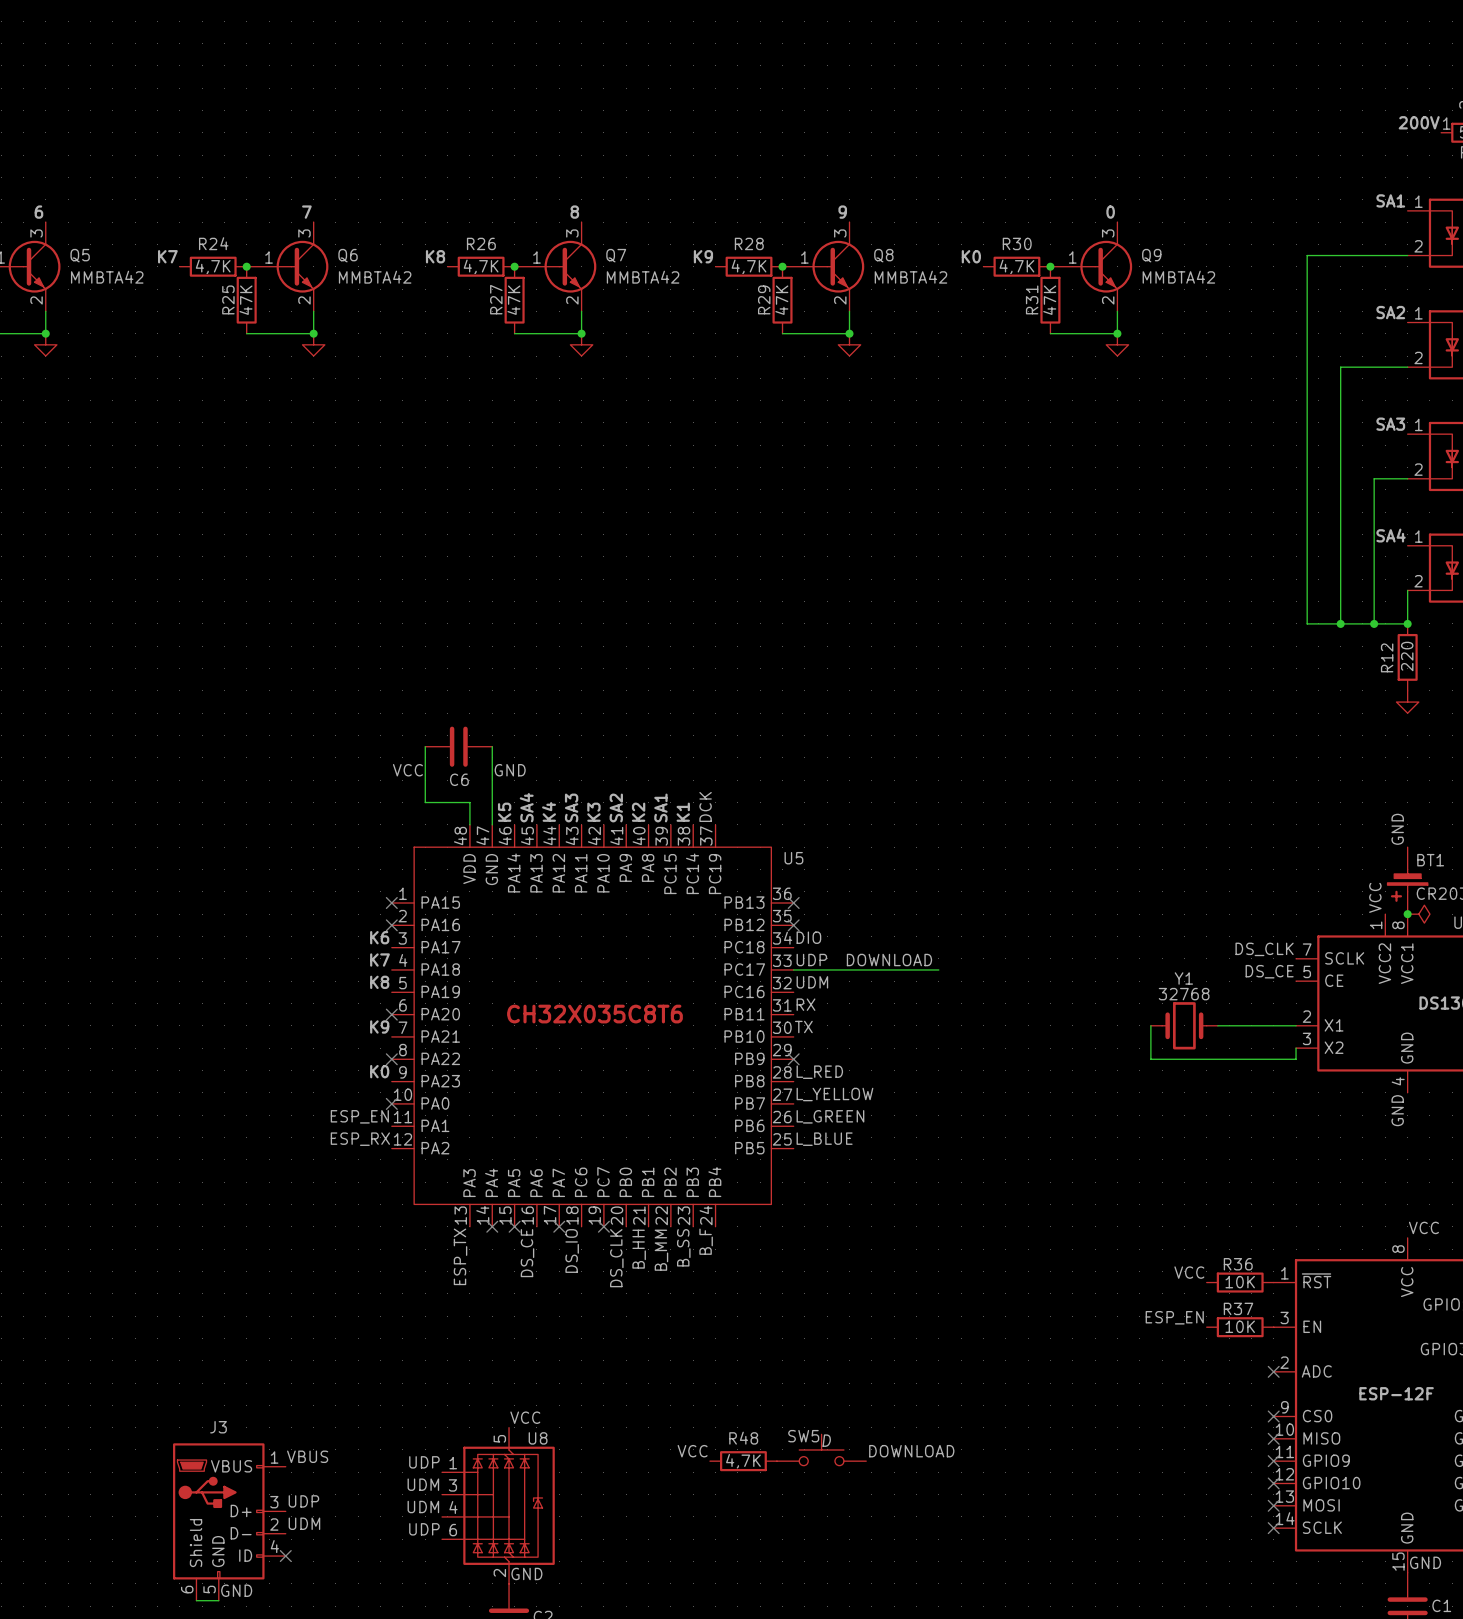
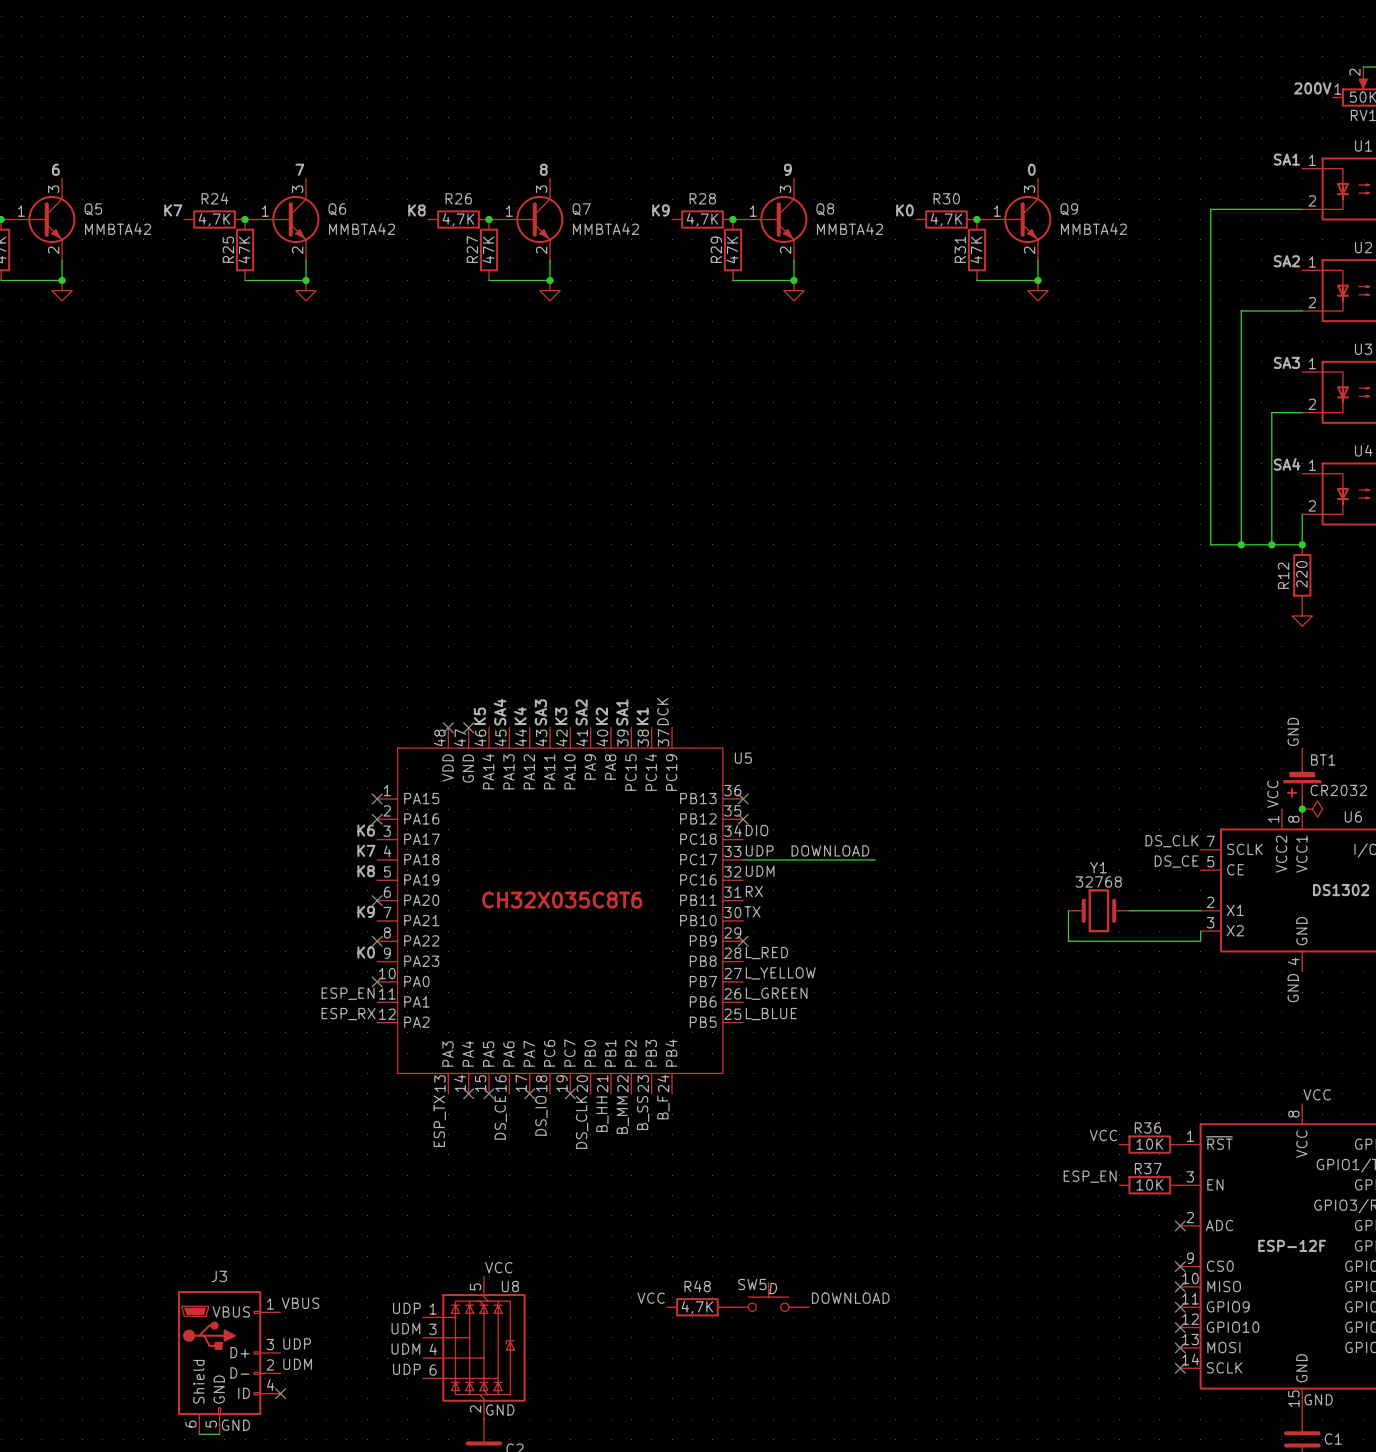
wire: (425, 746) (425, 802) (469, 802) (469, 824) -> none
C6: (458, 746) -> none
wire: (492, 746) (492, 824) -> none
label: VCC (407, 770) -> none
label: GND (510, 770) -> none
no-connect mark: none -> (448, 727)
no-connect mark: none -> (468, 727)

